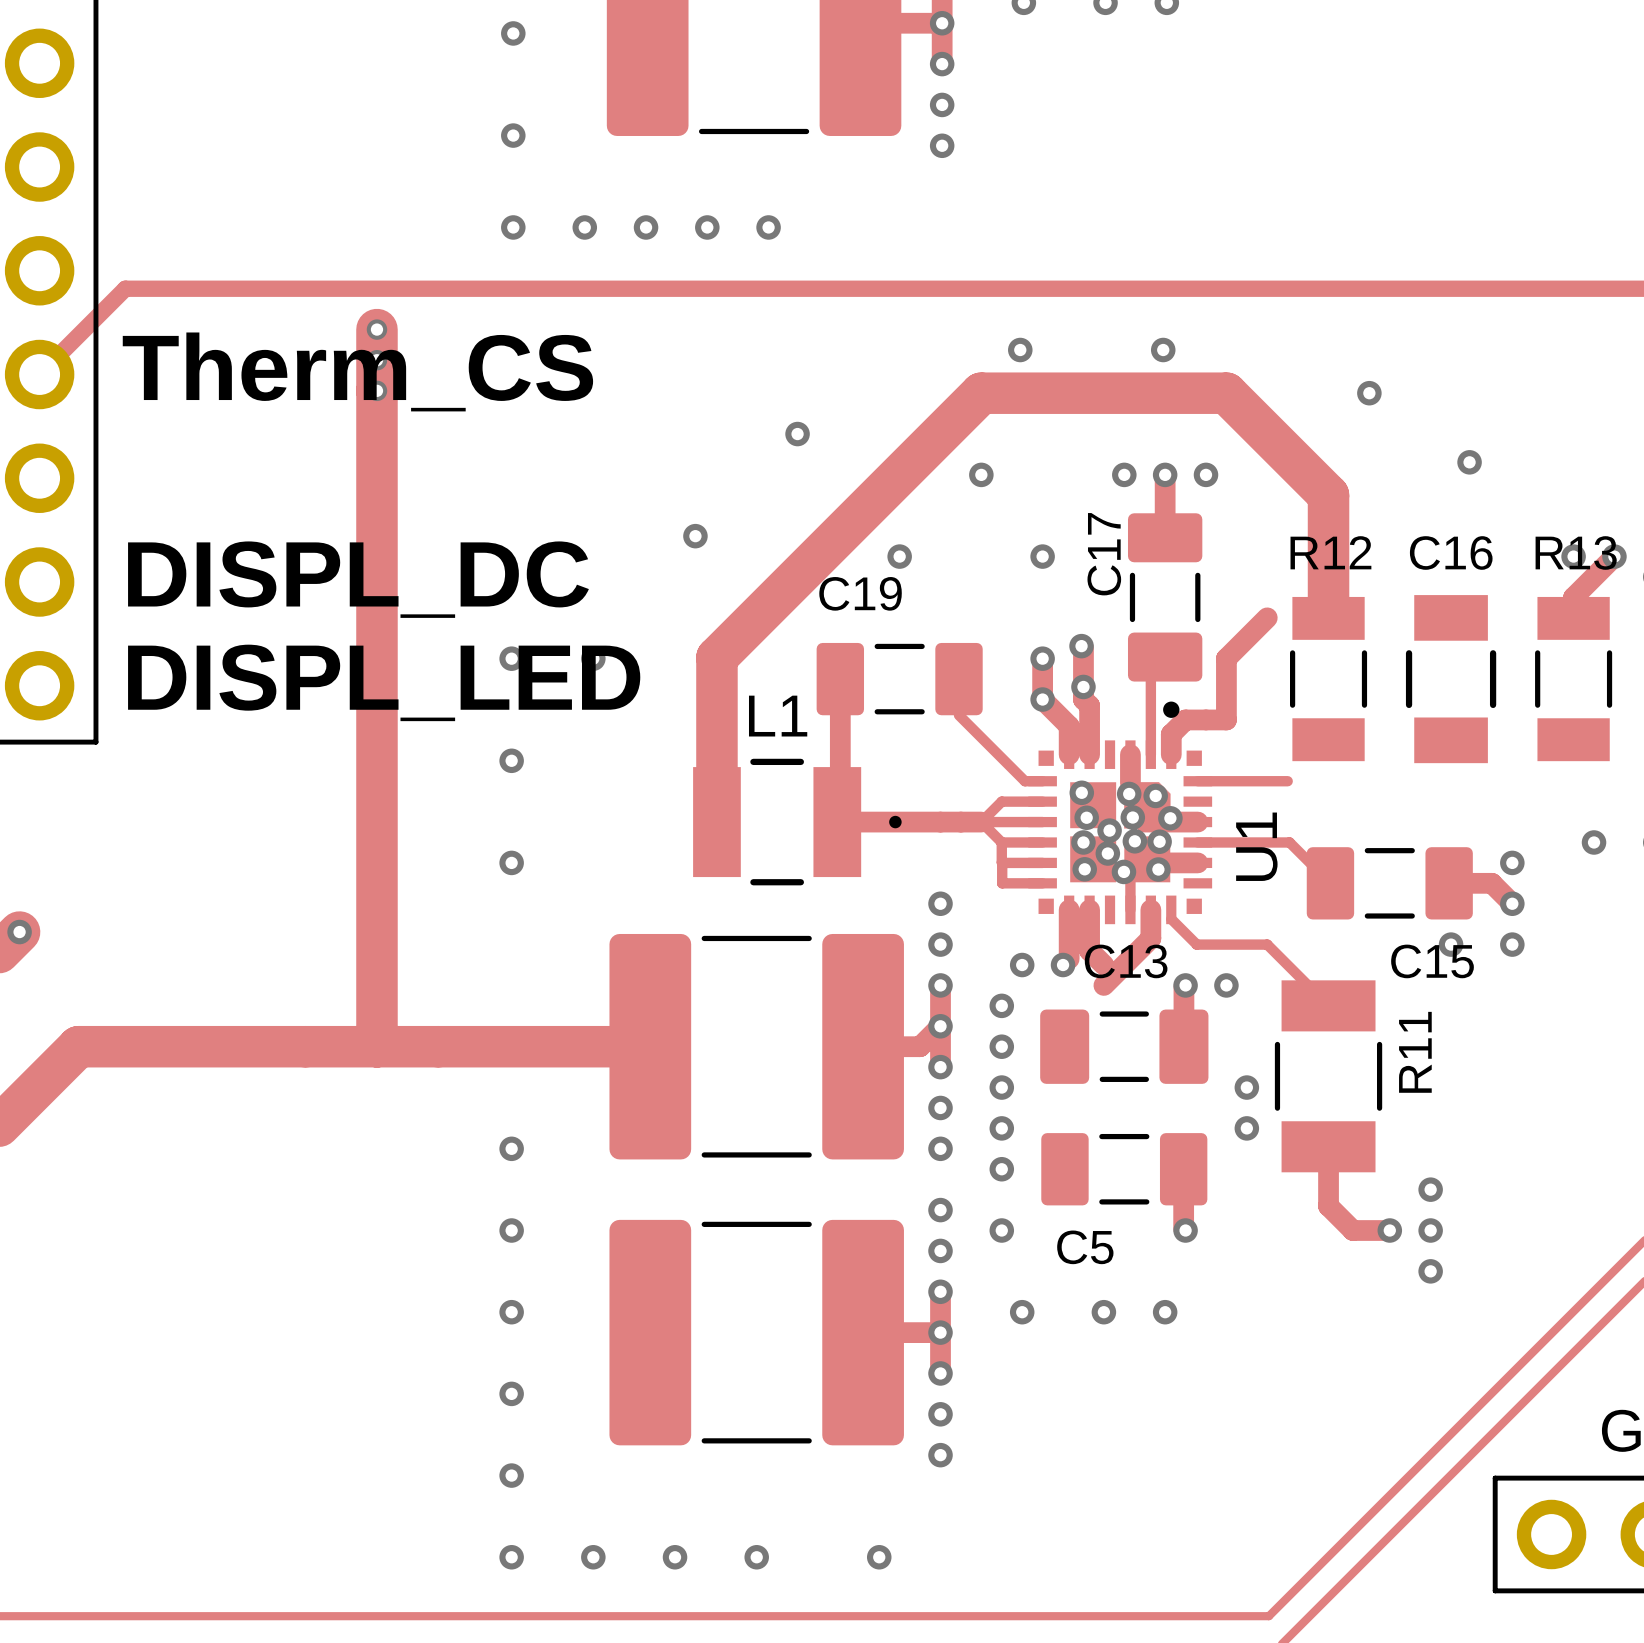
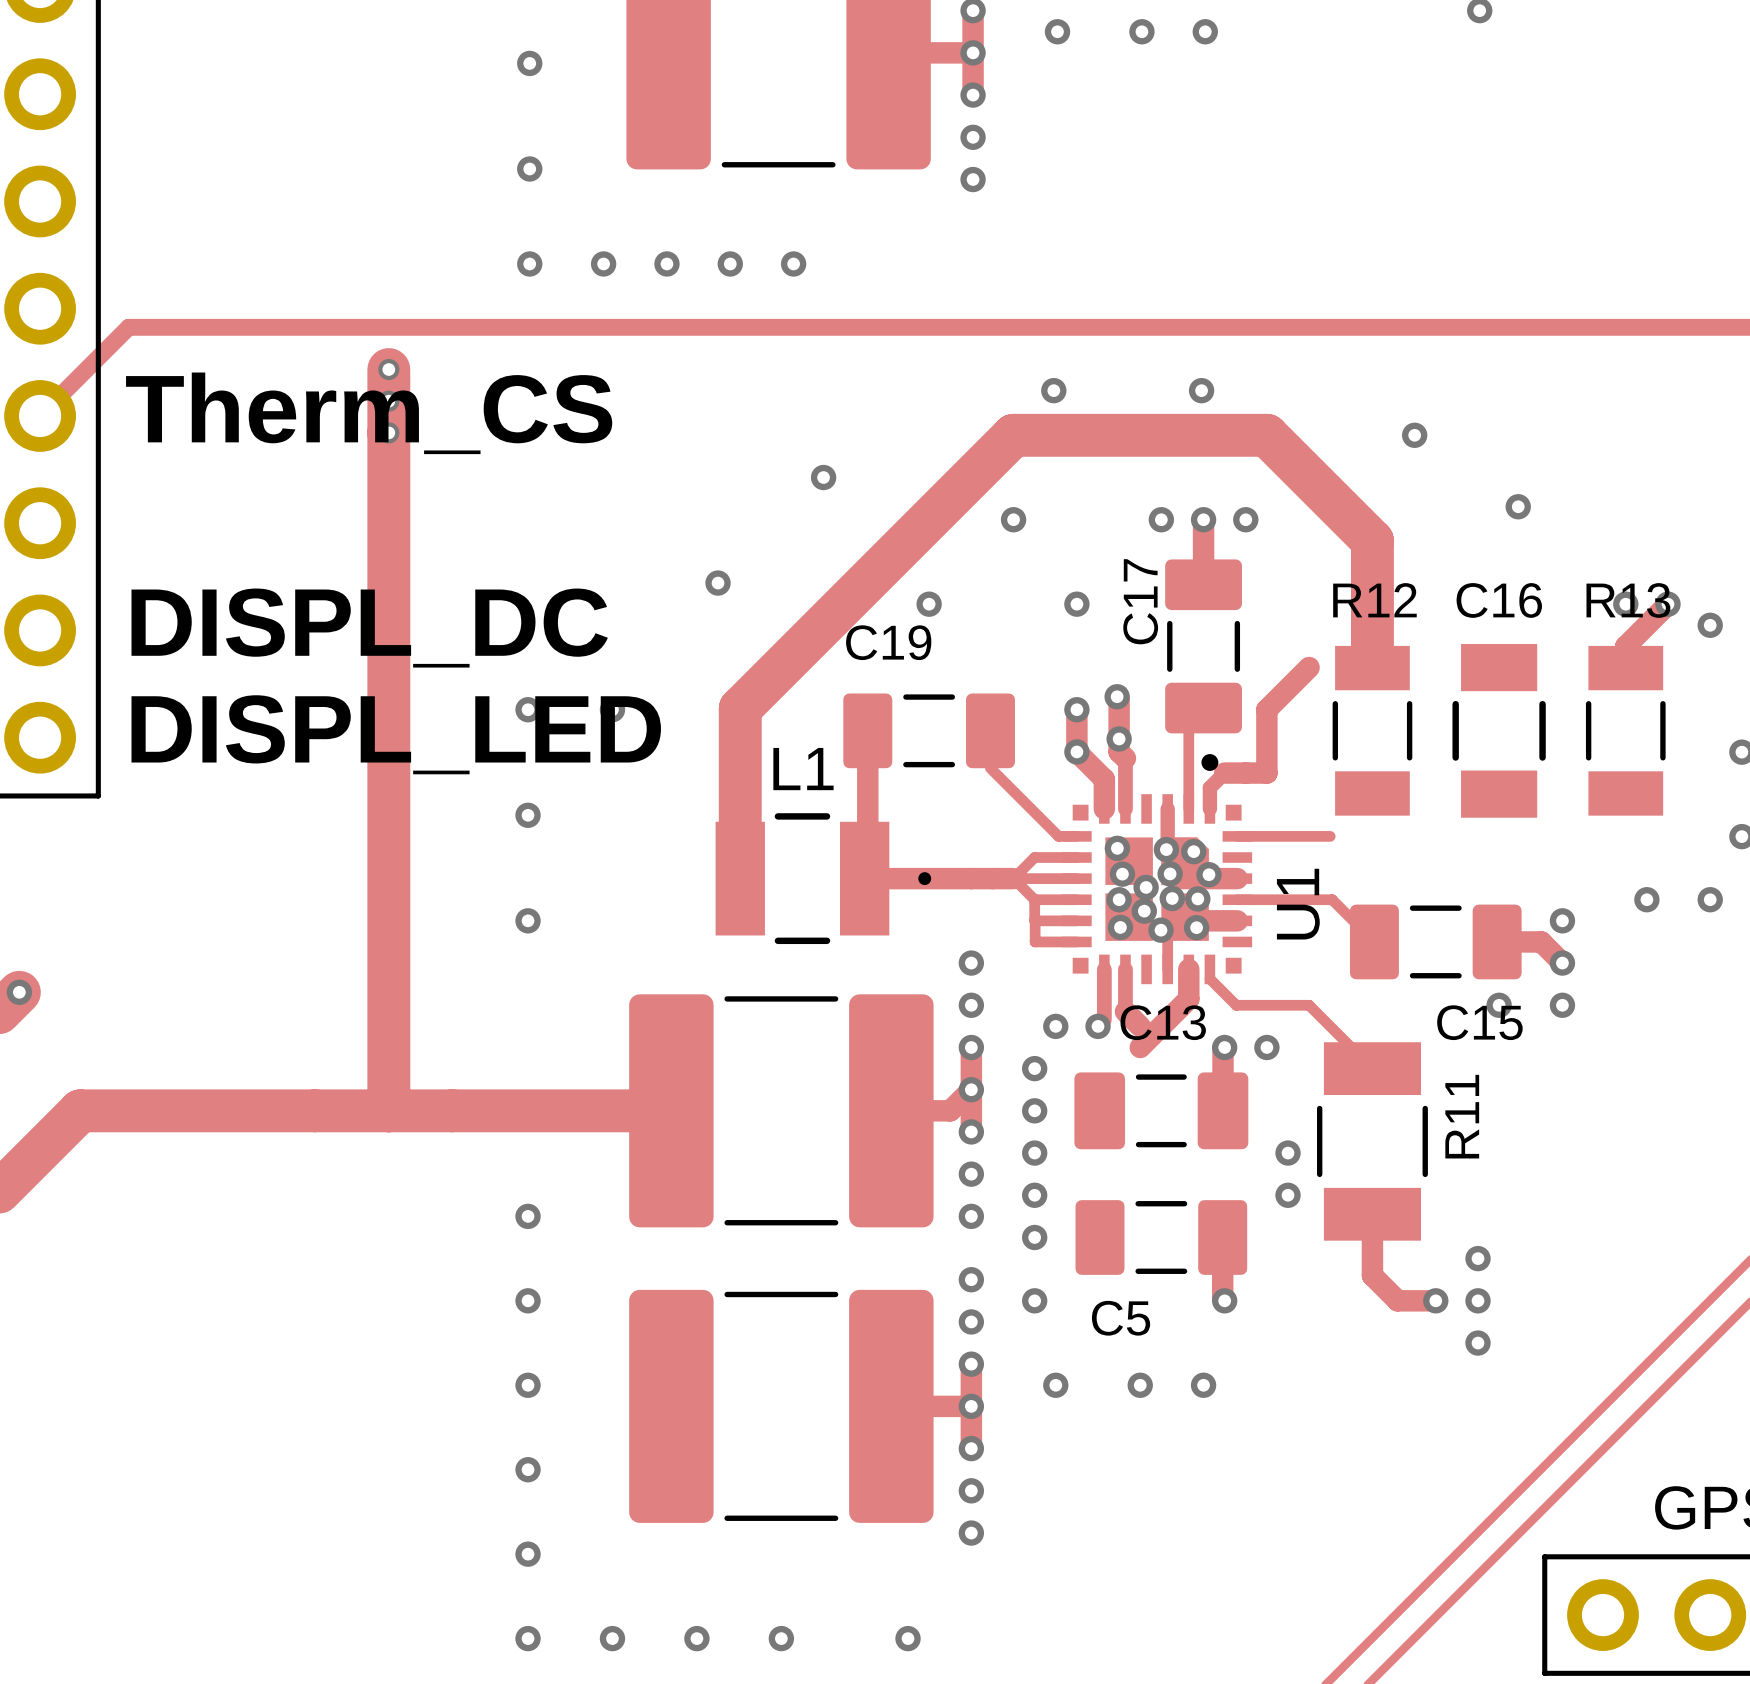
track width: thick (1089, 705) (1089, 754) -> thin (1125, 758) (1125, 808)
track width: thick (1185, 719) (1171, 734) (1171, 754) -> thin (1224, 773) (1209, 787) (1209, 808)
track width: thick (1130, 754) (1130, 783) -> thin (1167, 808) (1167, 838)
track width: thick (1069, 909) (1069, 958) -> thin (1104, 969) (1104, 1020)
track width: thick (1089, 909) (1089, 950) -> thin (1125, 969) (1125, 1011)

